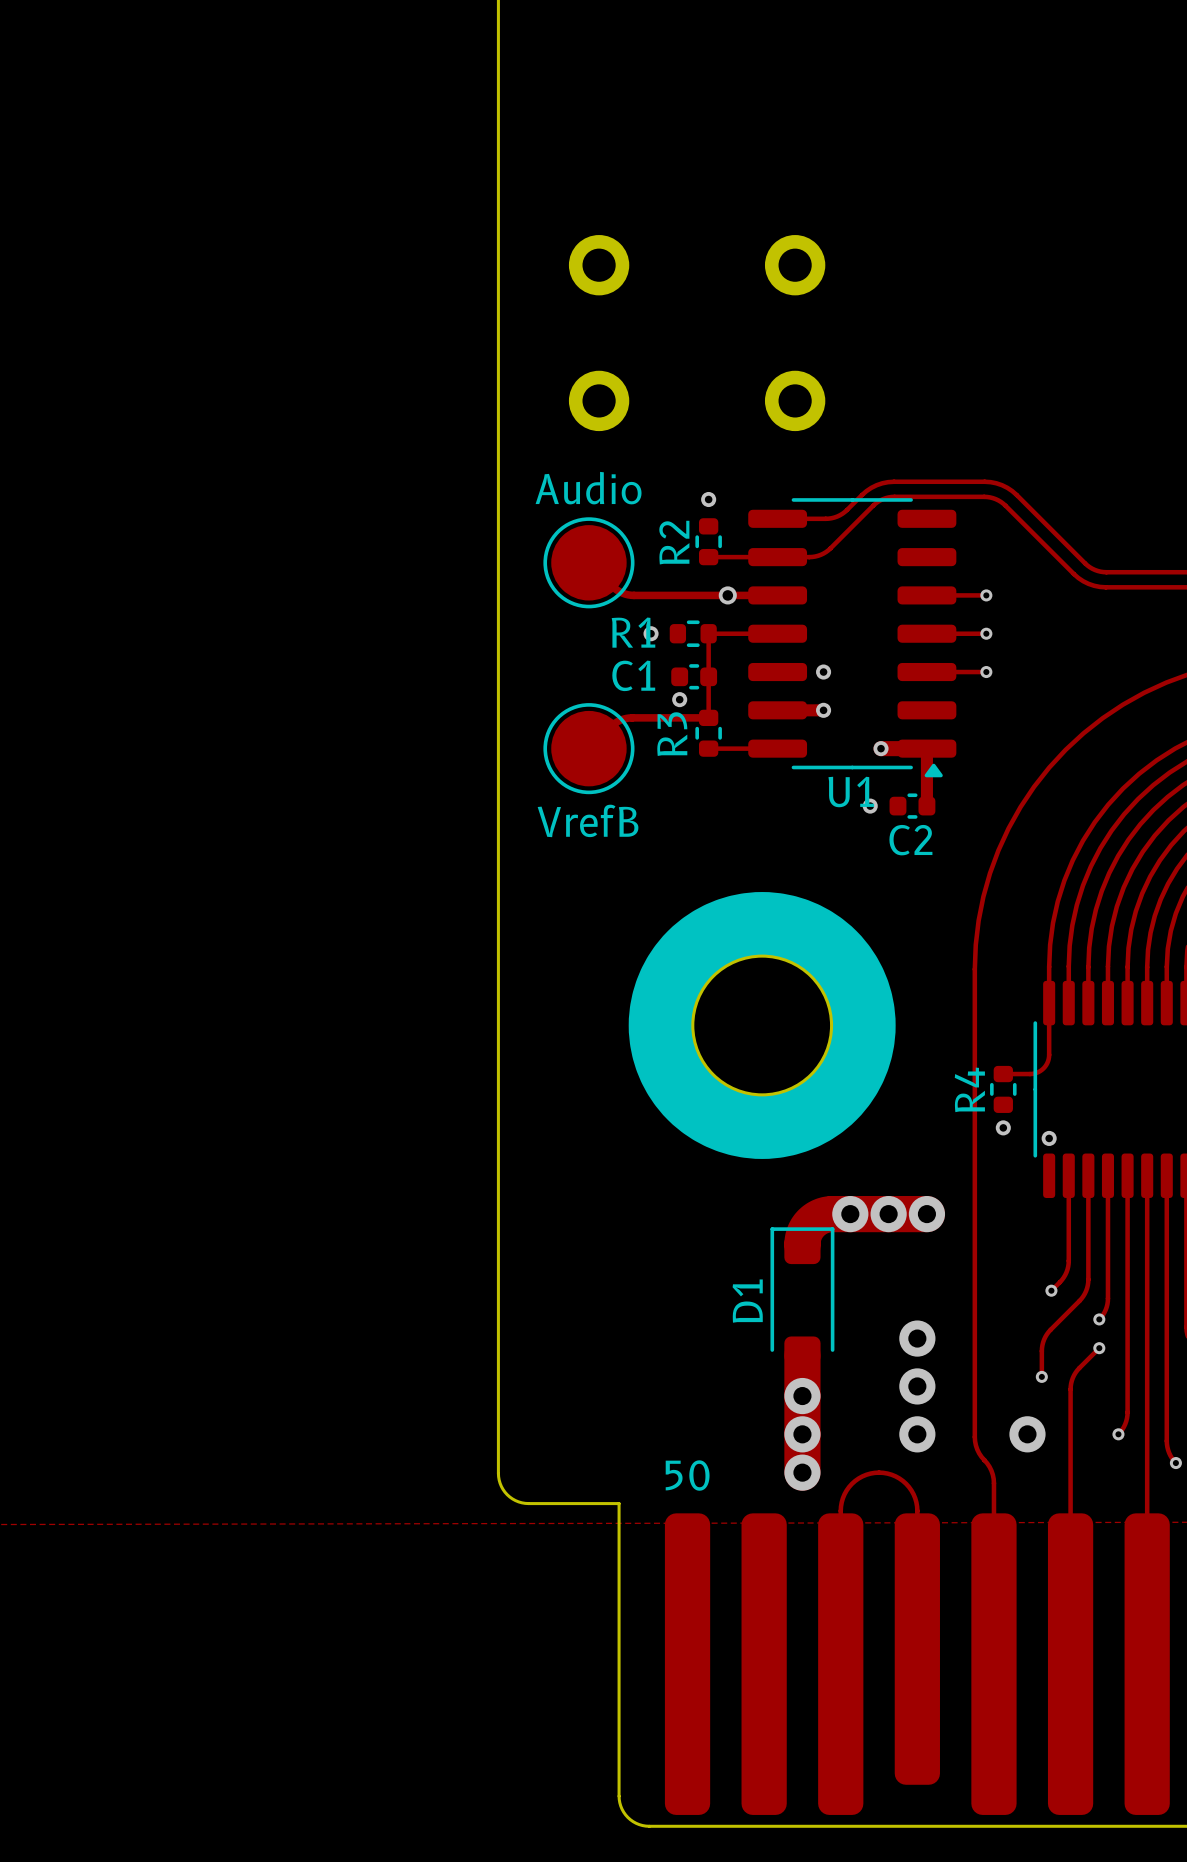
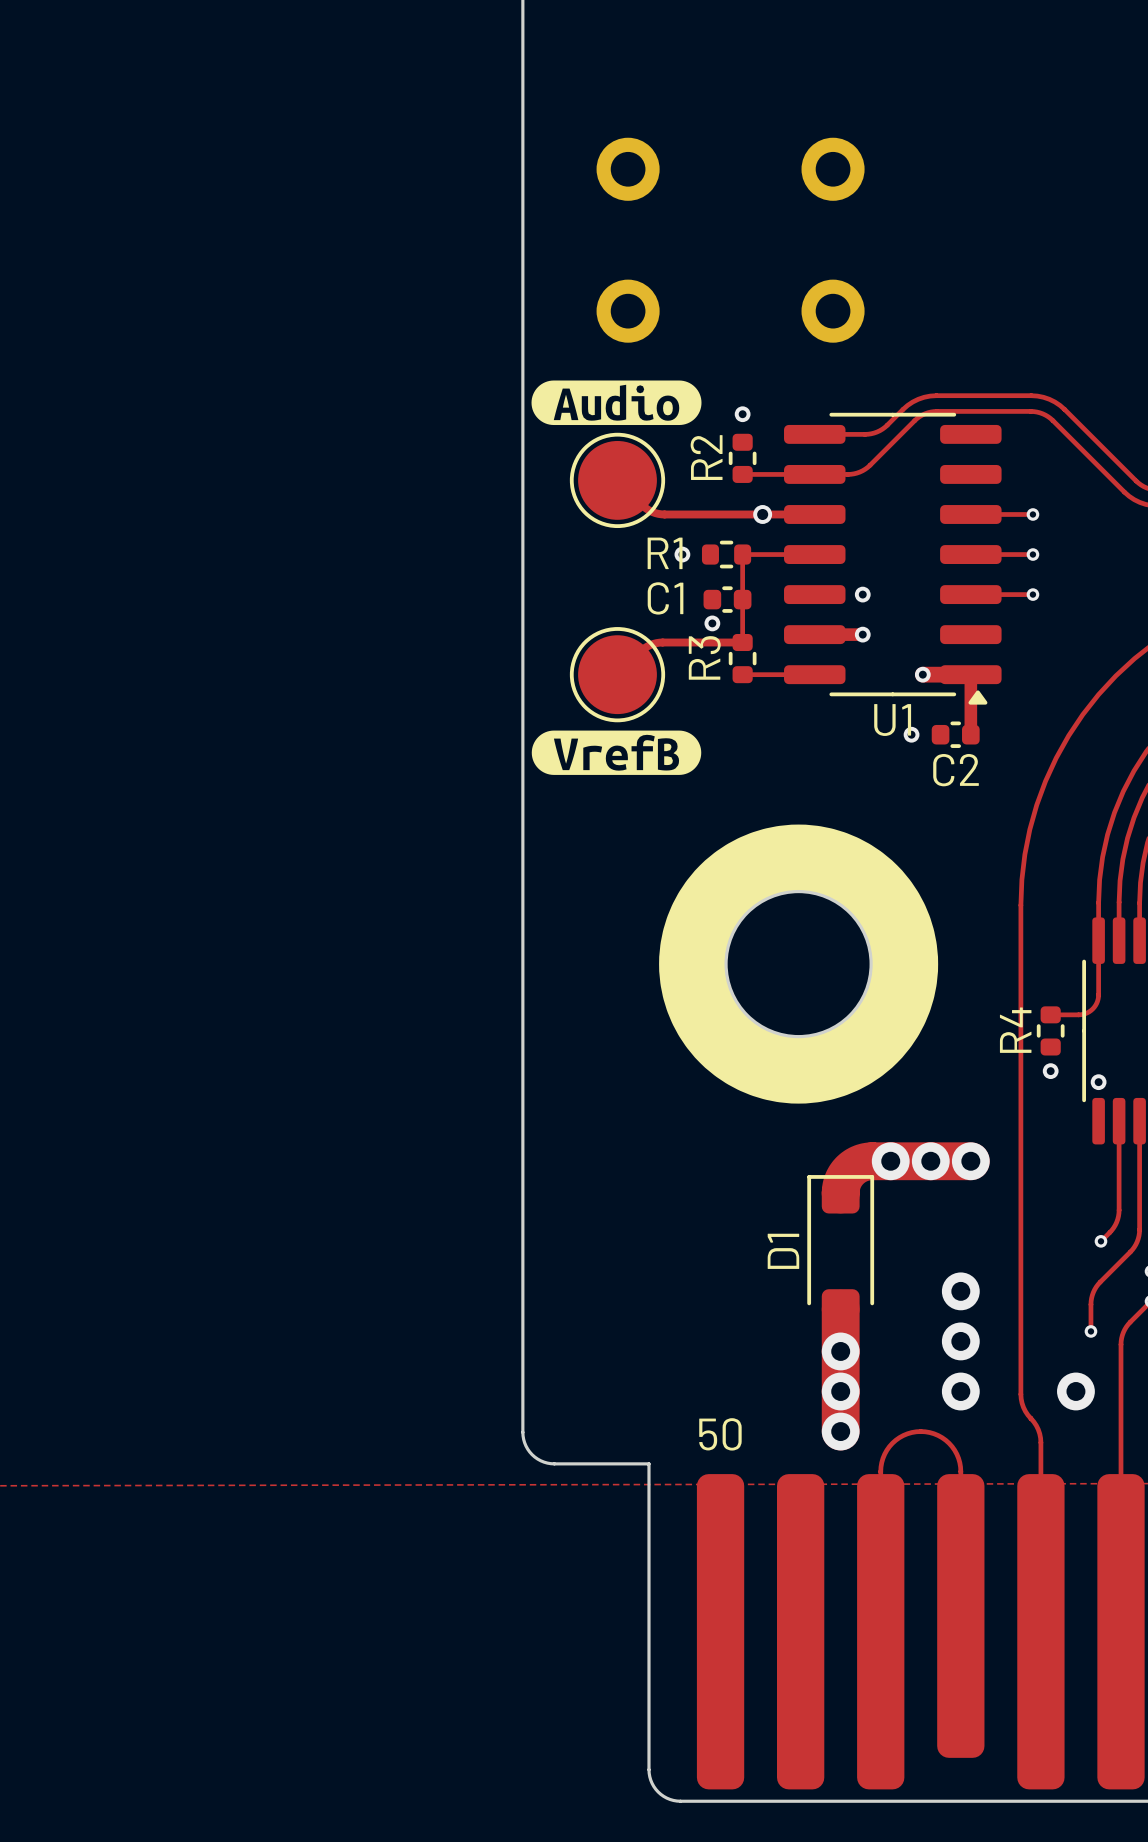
drawing: none -> [531, 380, 702, 426]
part value: Audio (588, 488) -> none
drawing: none -> [531, 730, 702, 775]
part value: VrefB (588, 820) -> none

